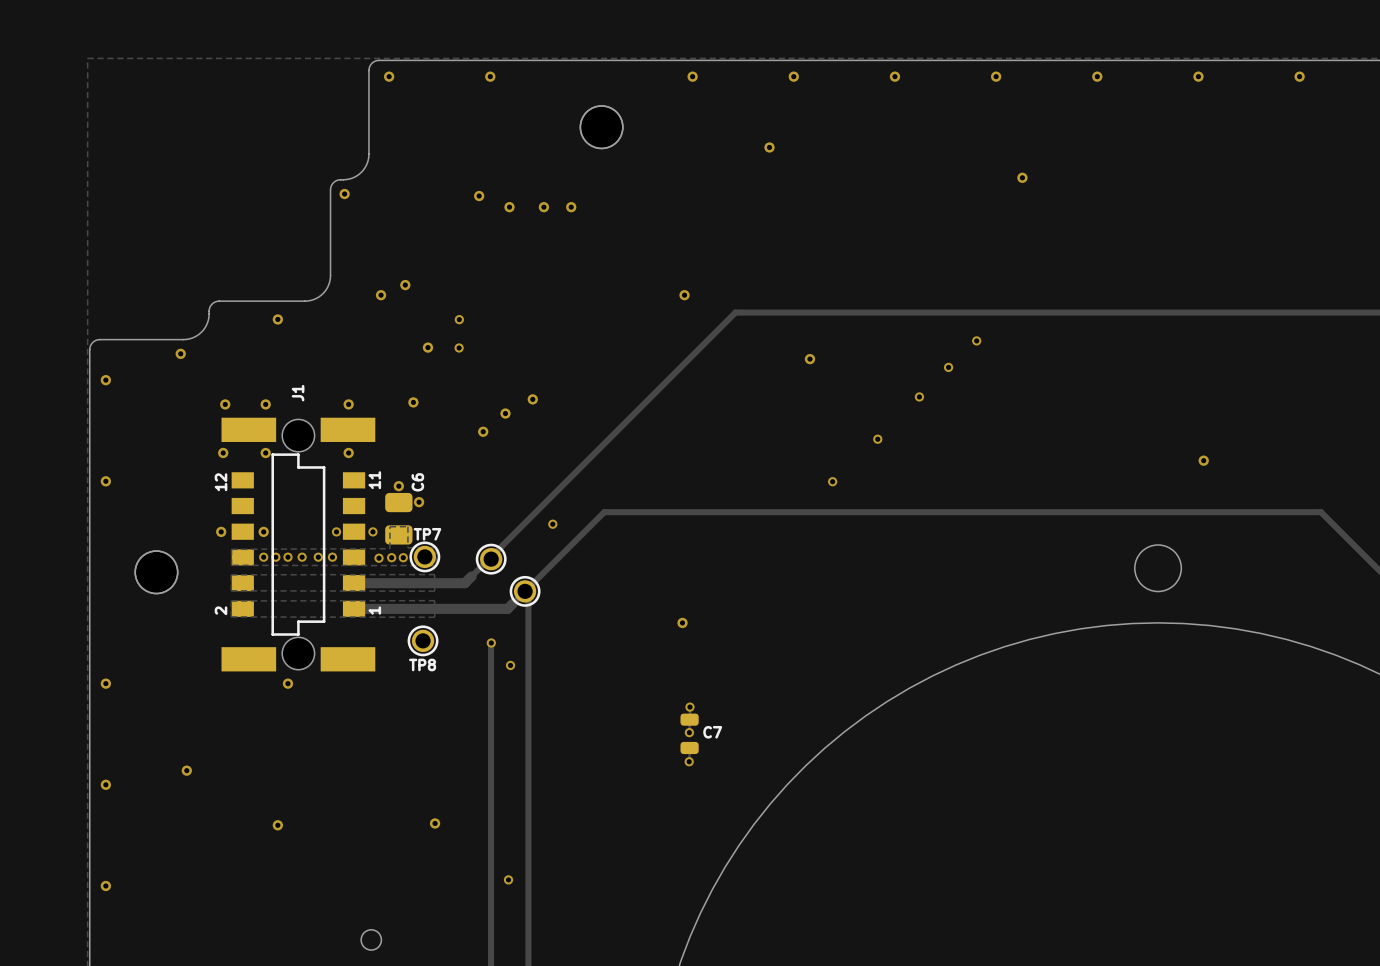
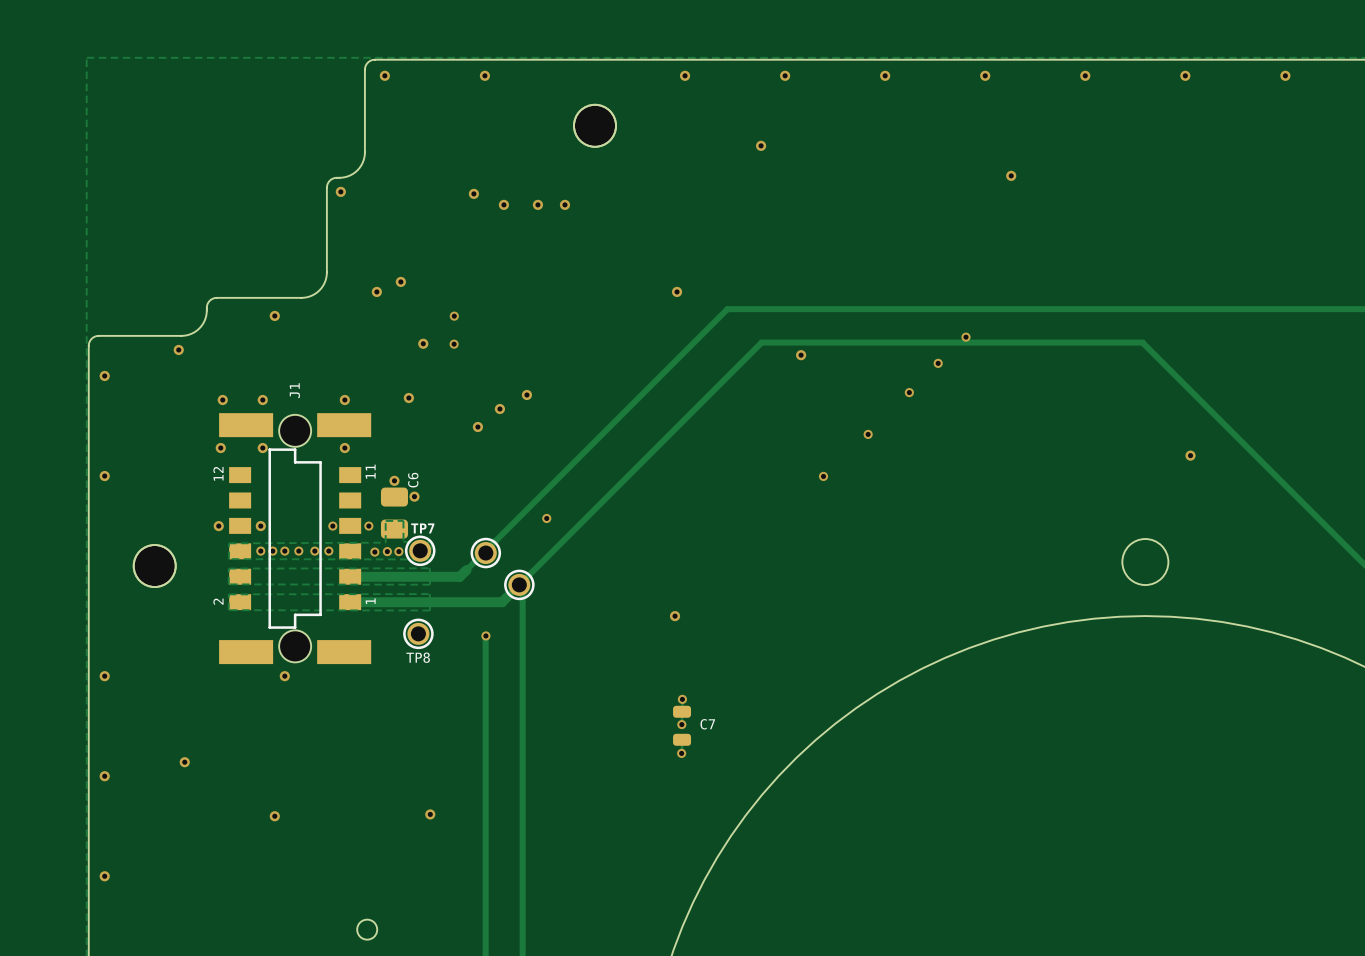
track: (604, 512) (1320, 512) -> (597, 506) (761, 342) (1142, 342) (1306, 506)
via: (510, 665) -> none
via: (508, 879) -> none

